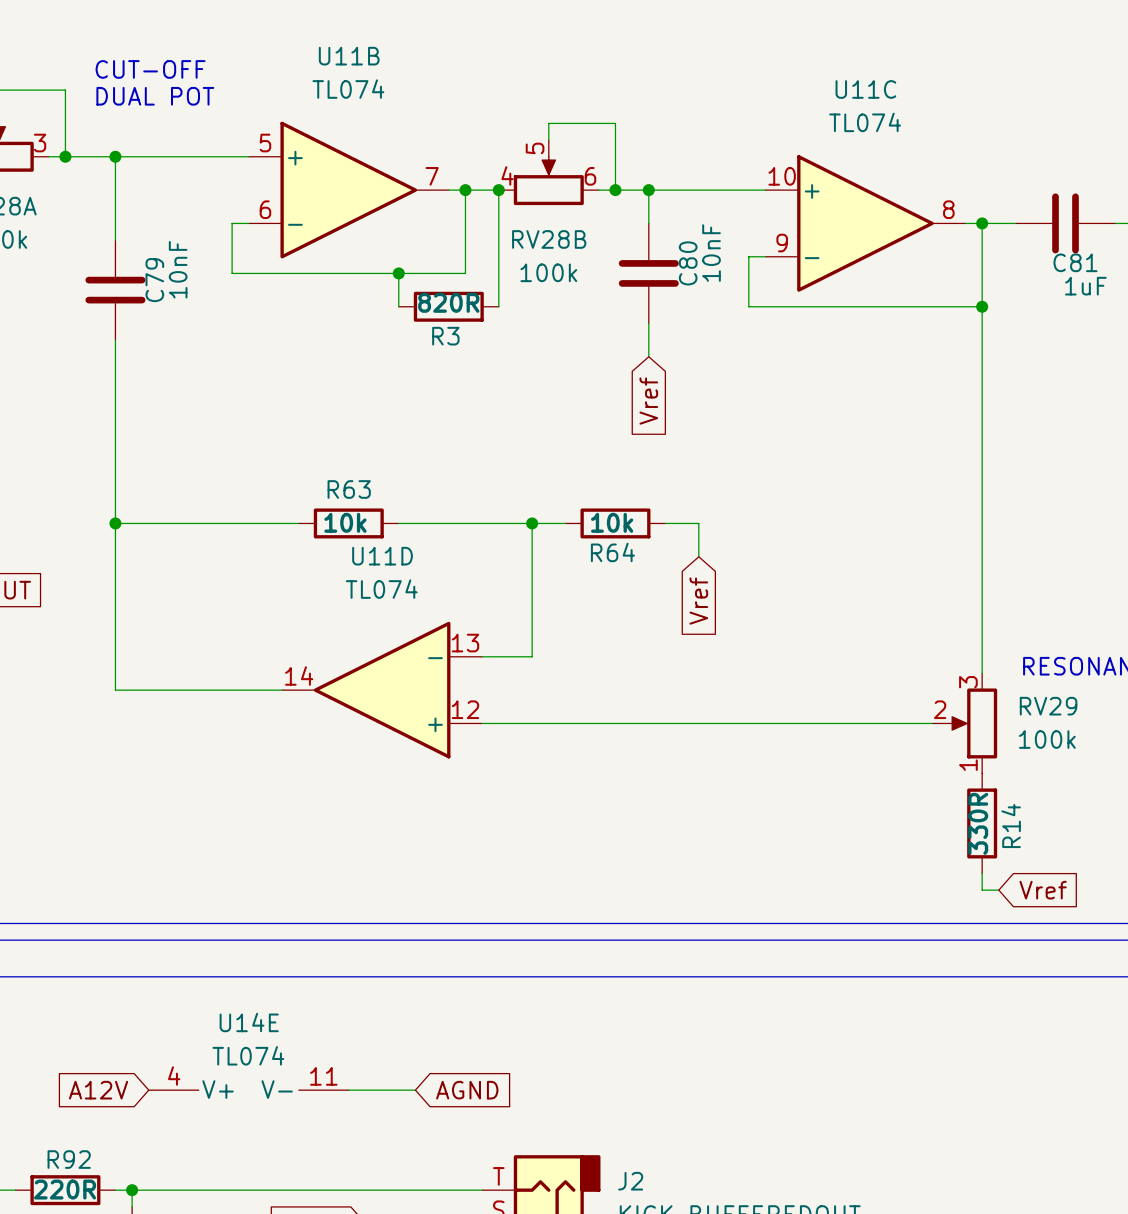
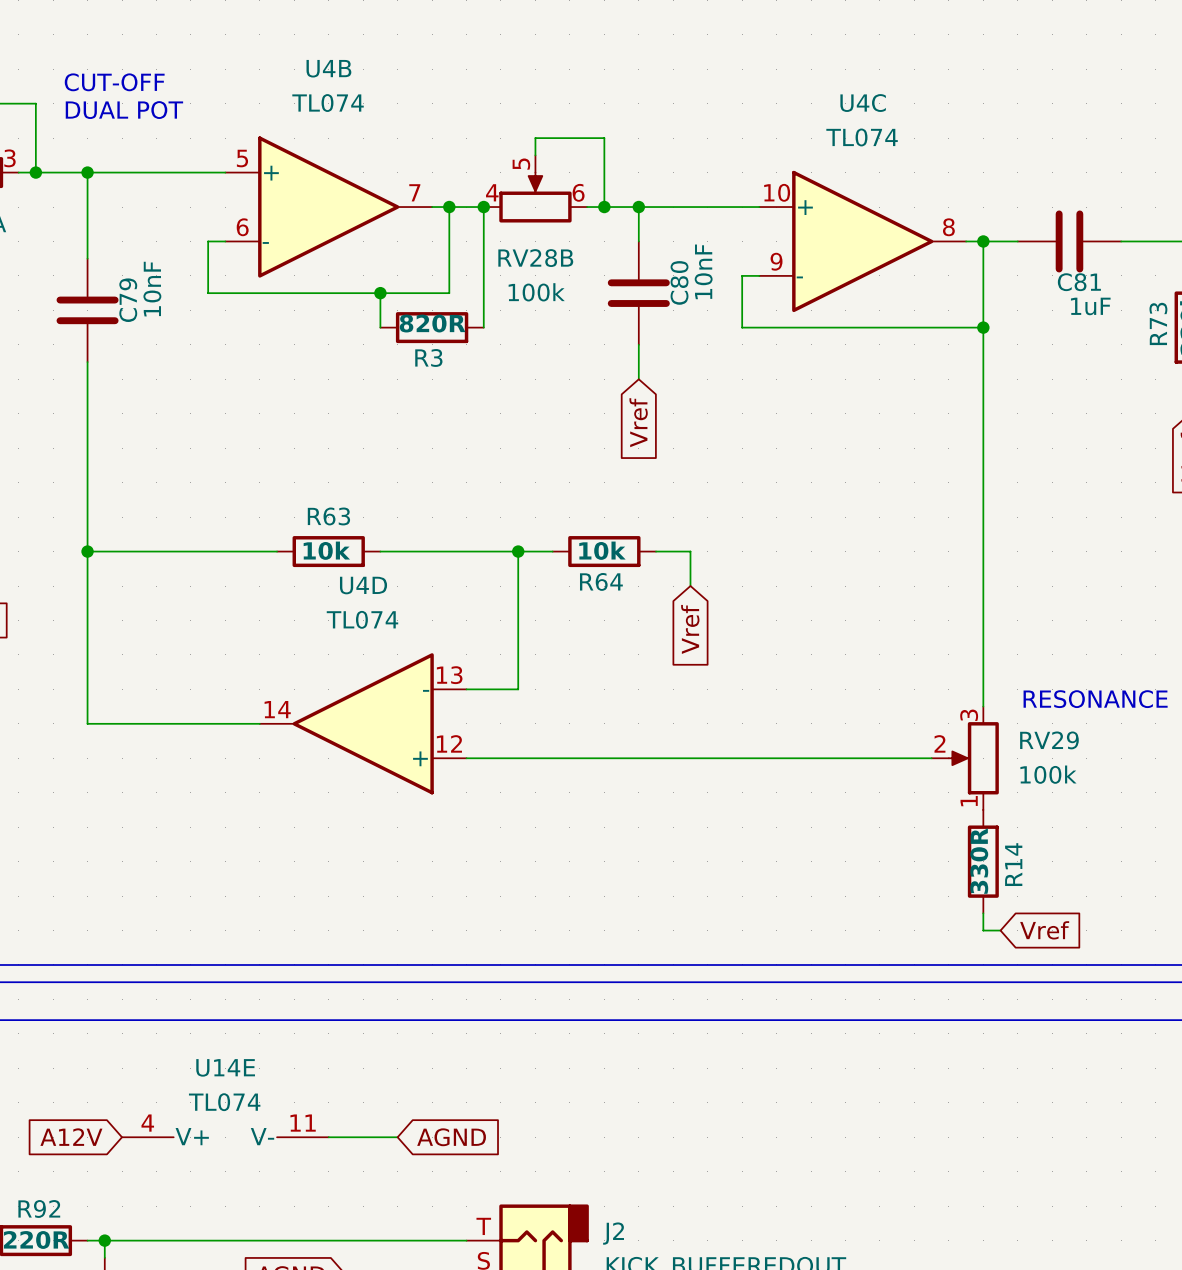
U11B name: U11B (349, 56) -> U4B (328, 68)
U11C name: U11C (865, 89) -> U4C (863, 103)
U11D name: U11D (382, 556) -> U4D (363, 585)

